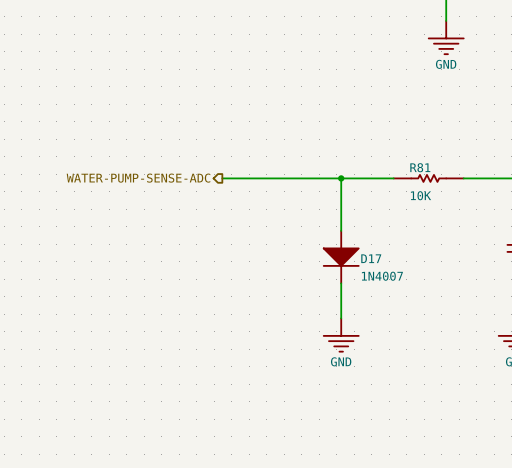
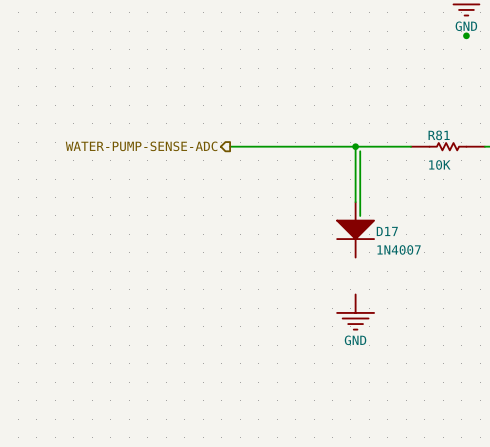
junction: none -> (466, 35)
wire: none -> (360, 151) (360, 215)
wire: (341, 283) (341, 318) -> none

